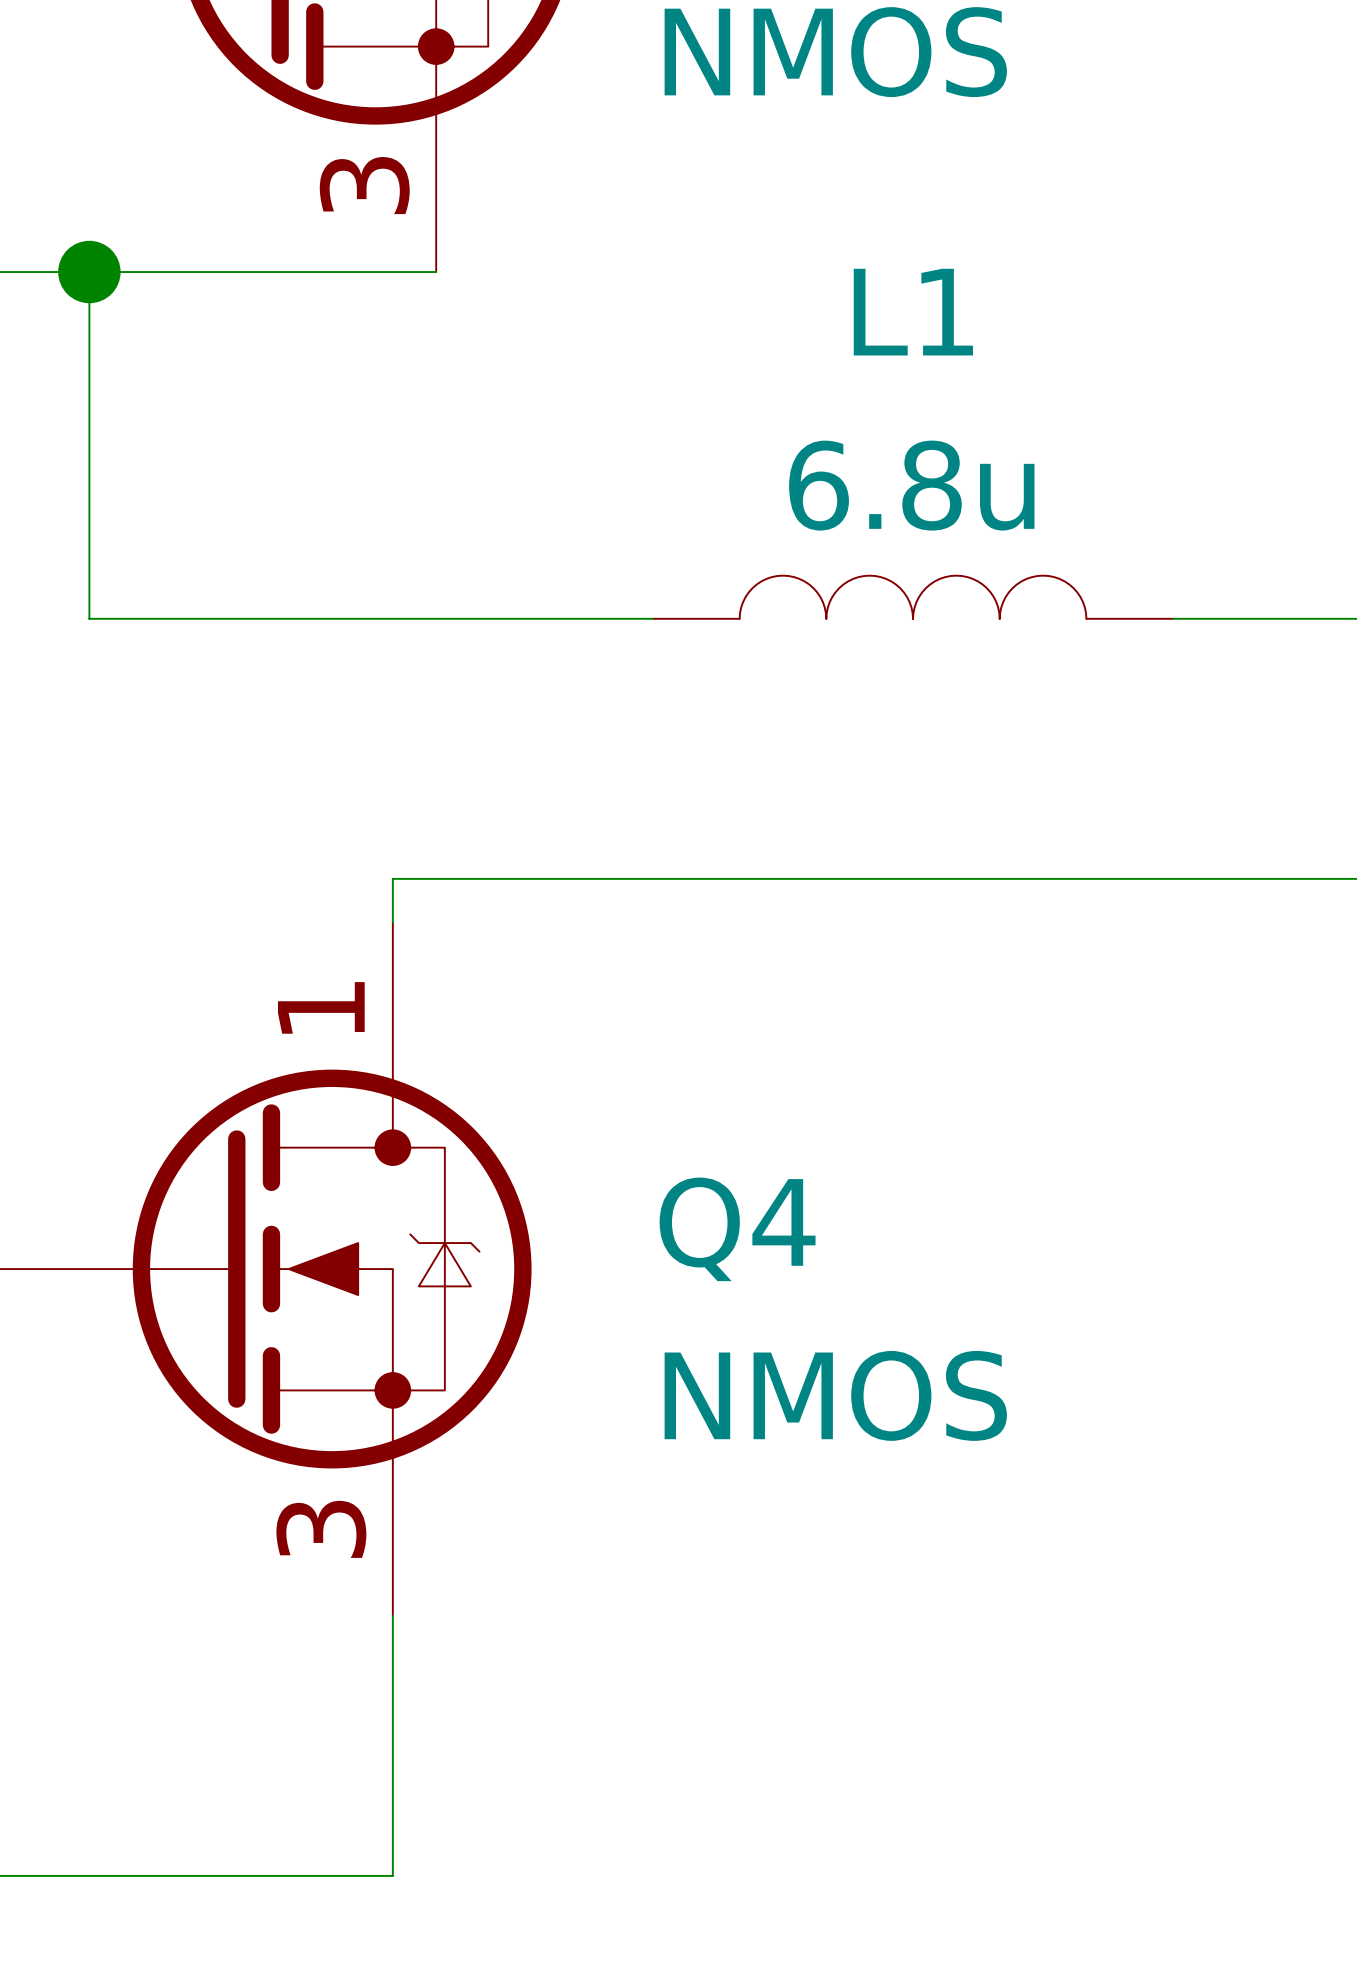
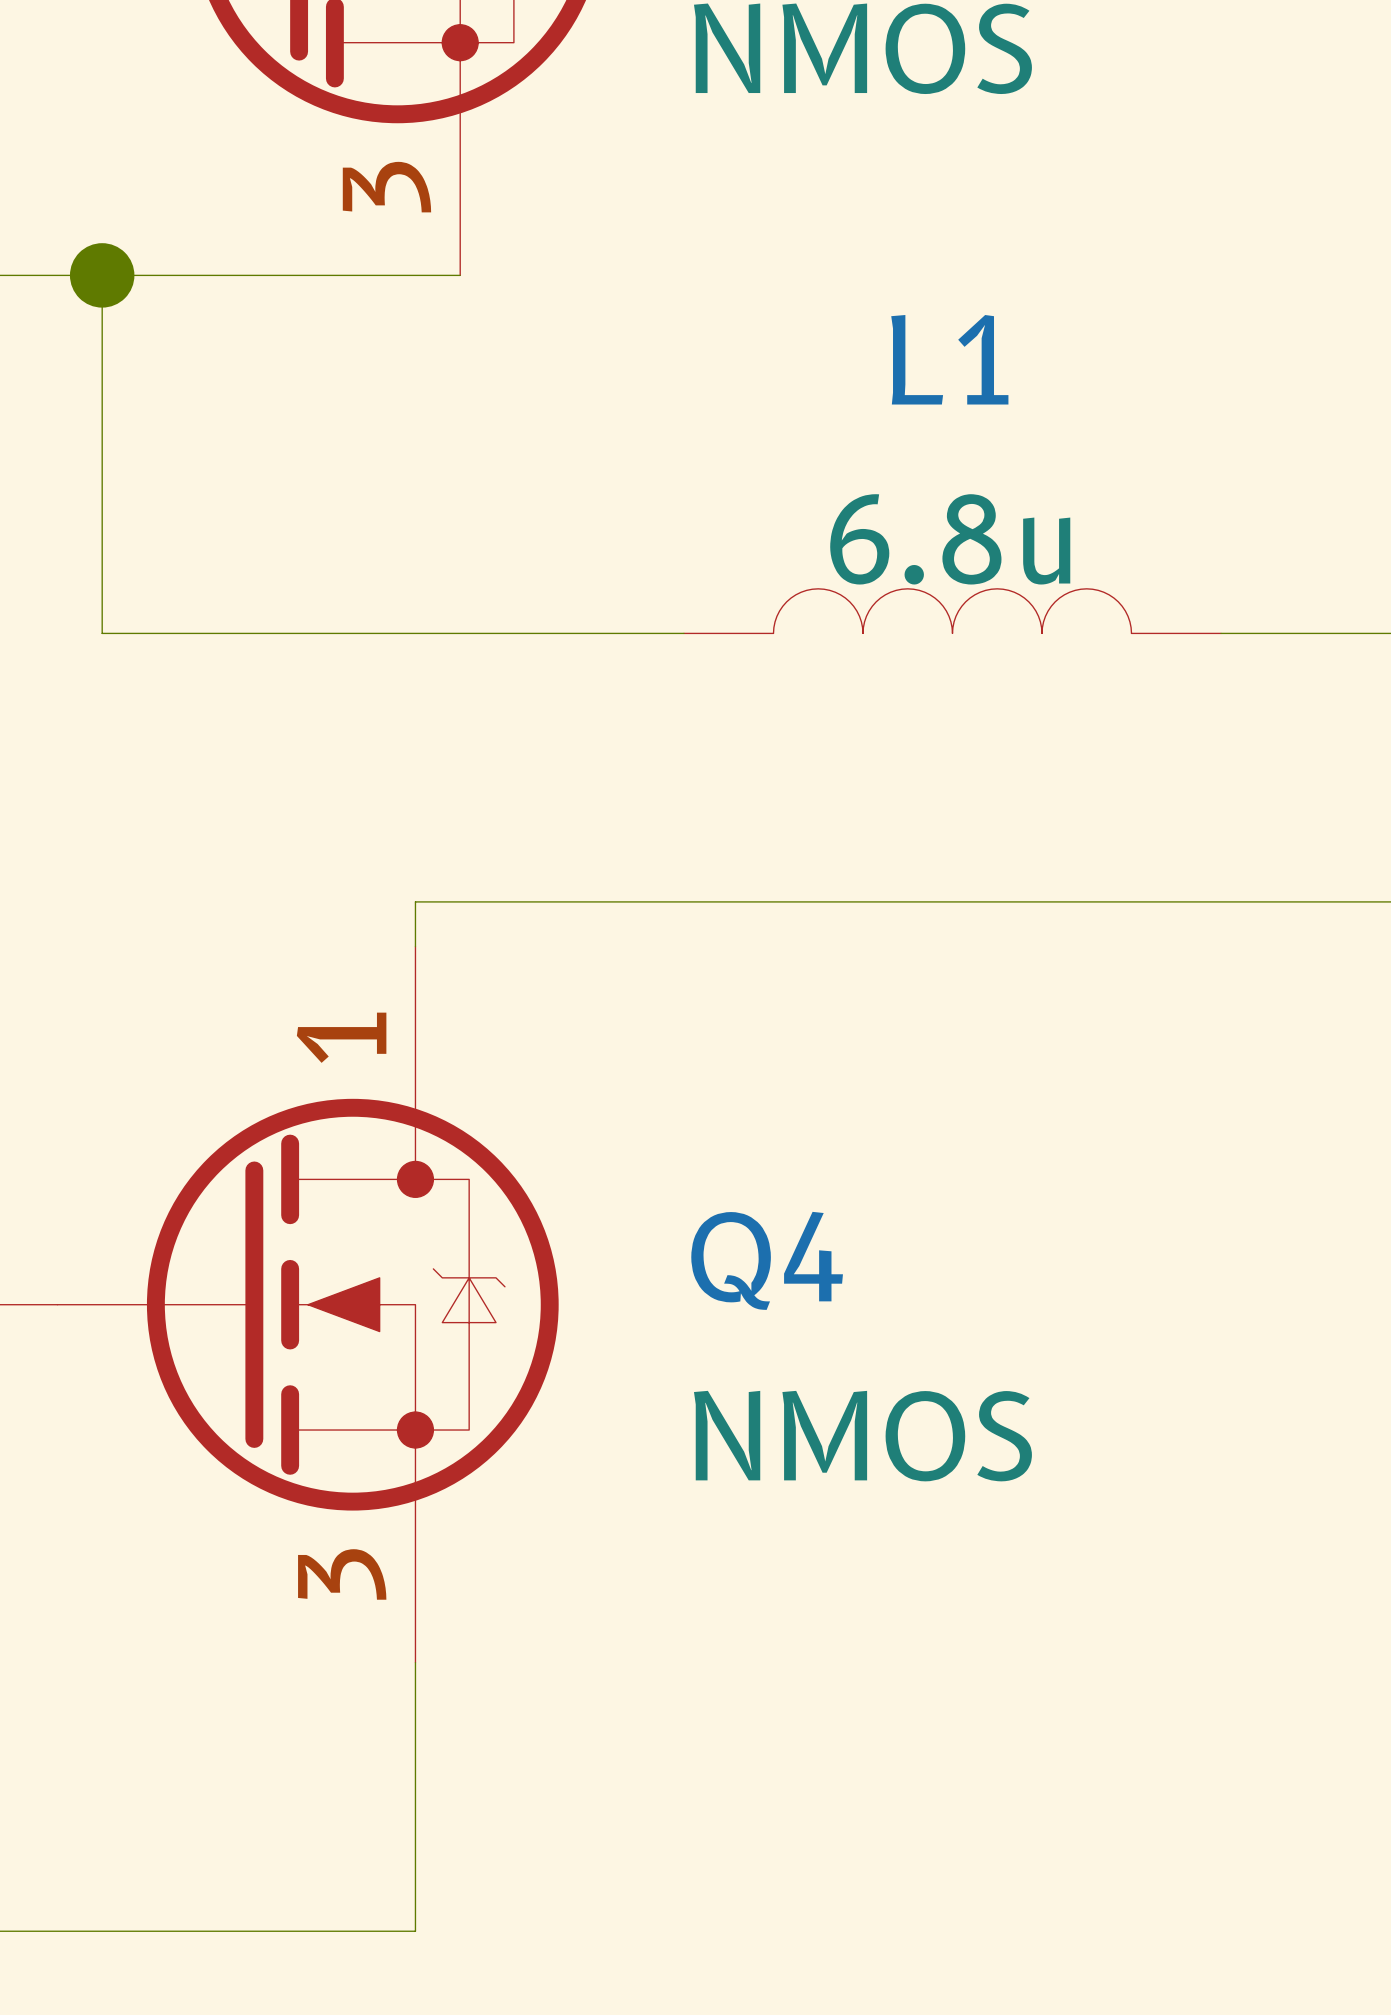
L1 name position: L1 (913, 312) -> L1 (949, 359)
L1 value position: 6.8u (911, 485) -> 6.8u (950, 539)

